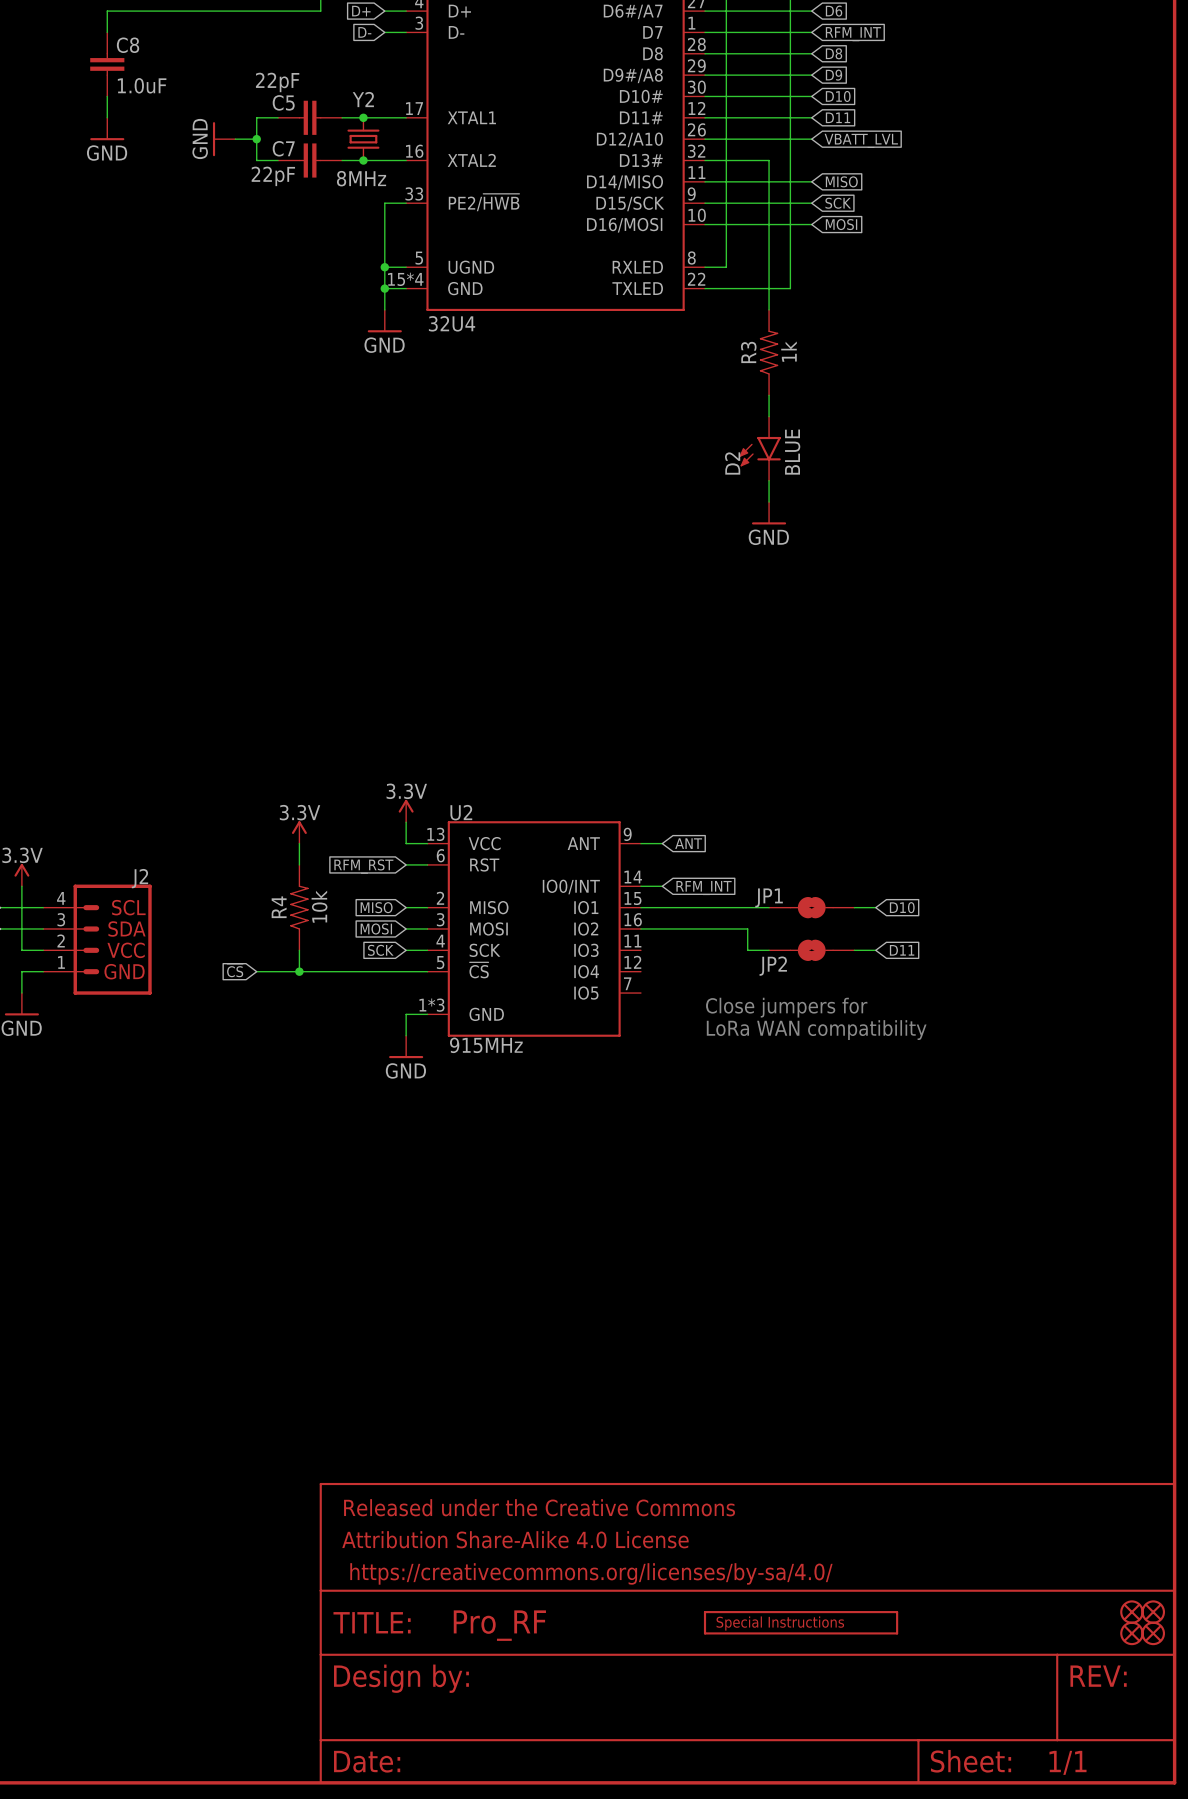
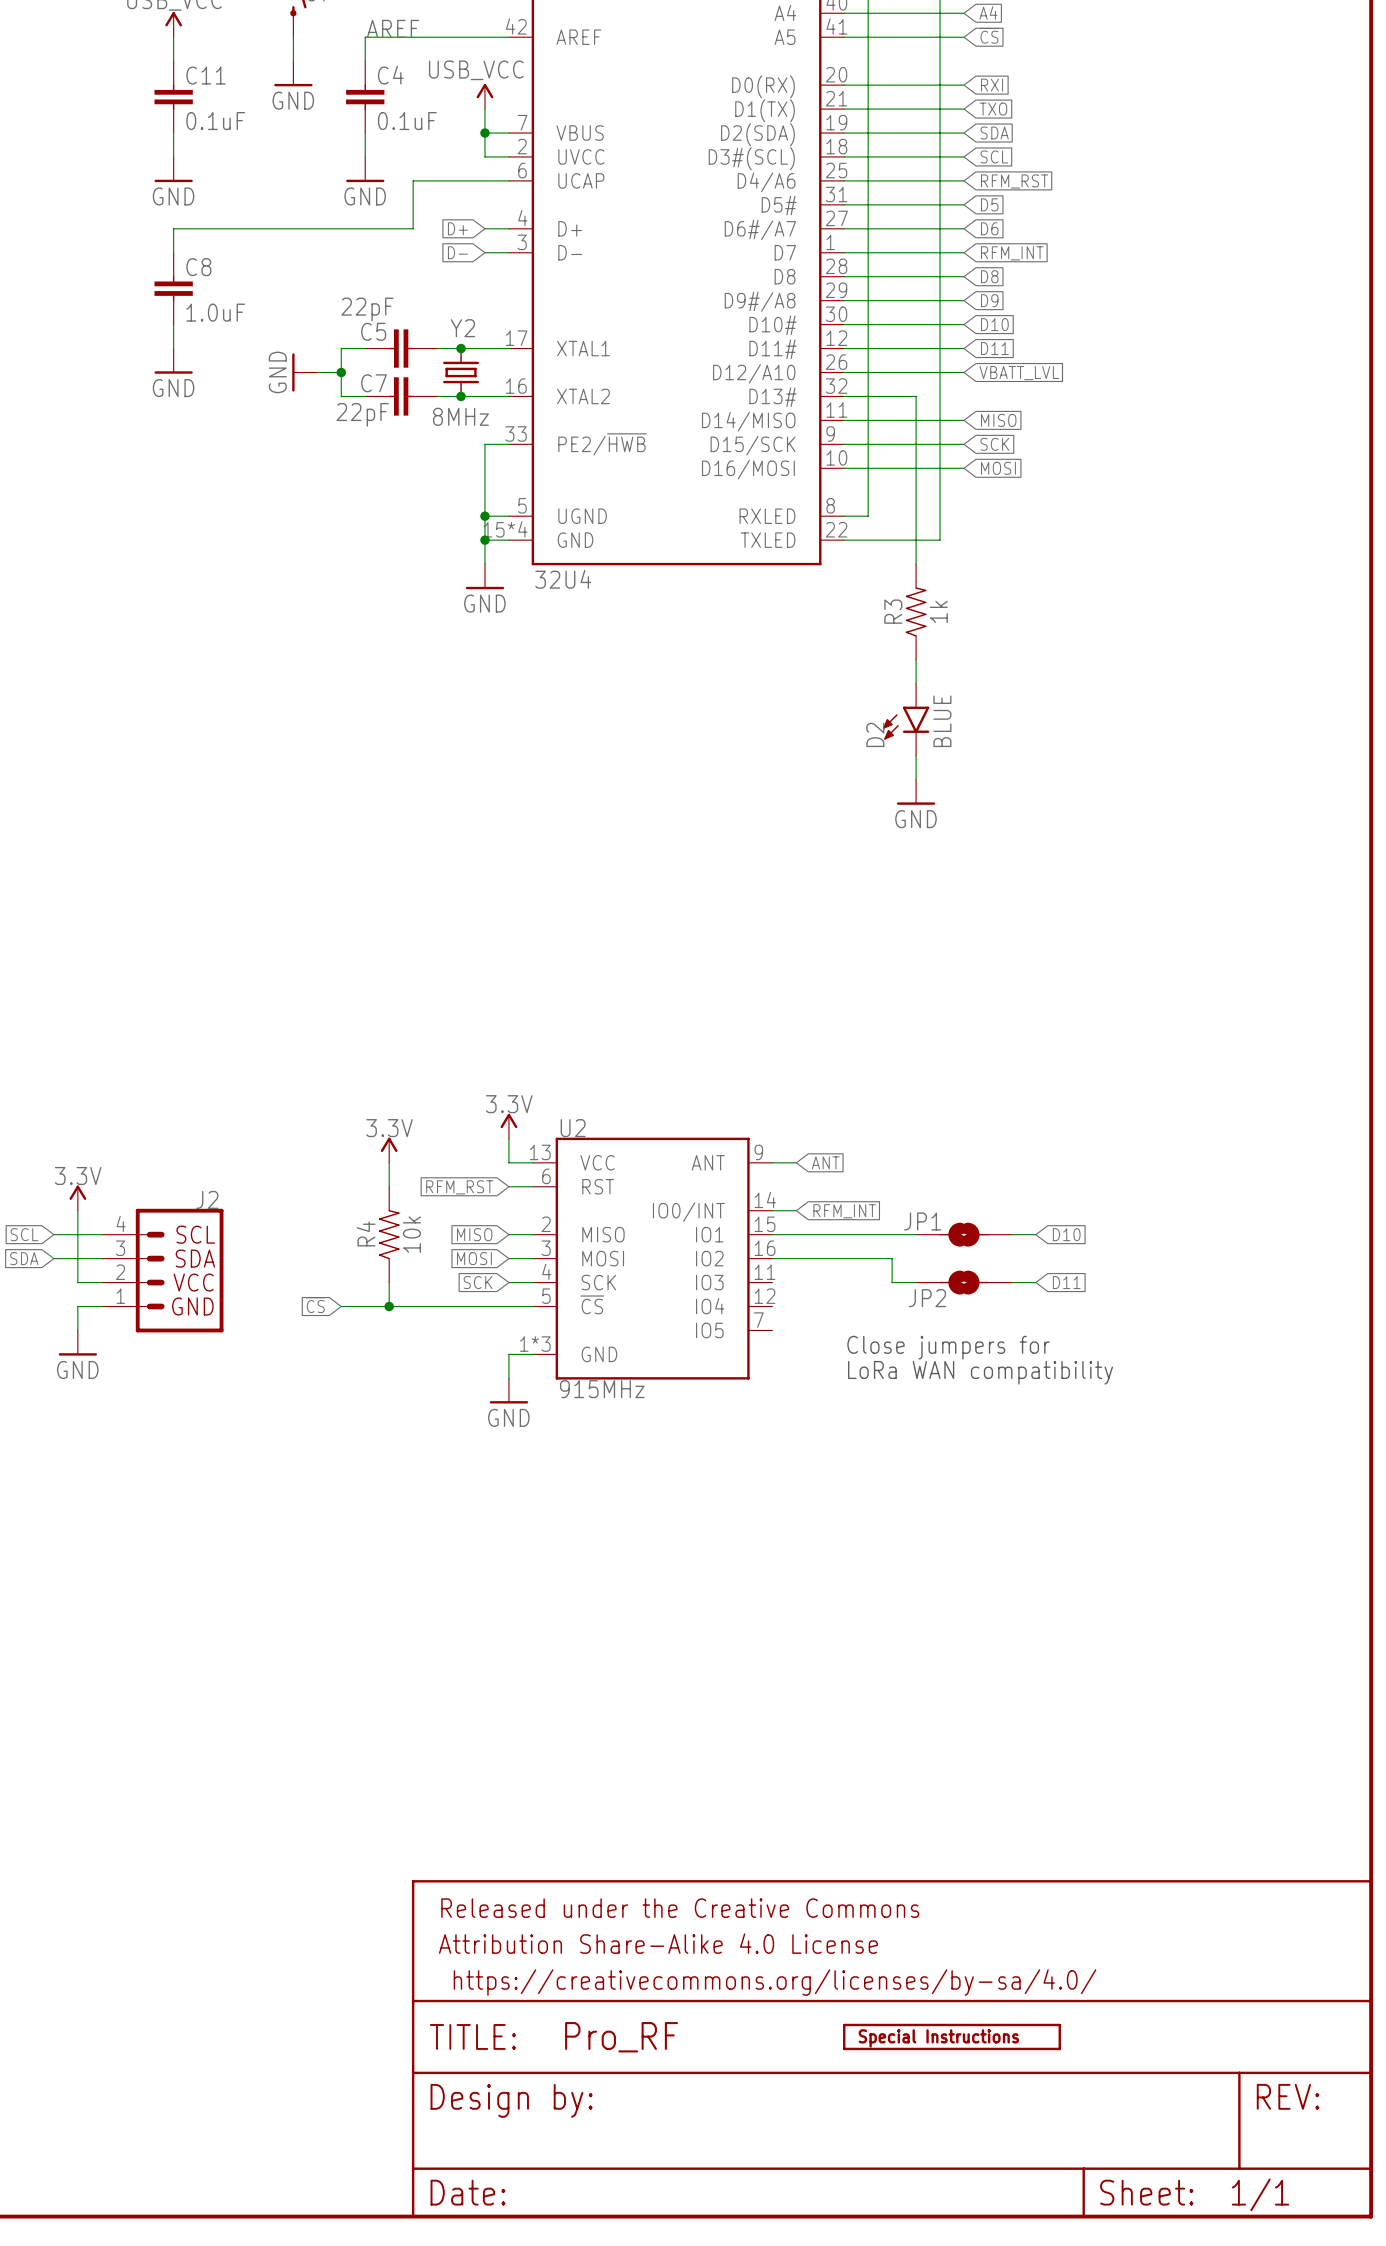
part: (1131, 1612) -> none
part: (1153, 1612) -> none
part: (1131, 1633) -> none
part: (1153, 1633) -> none

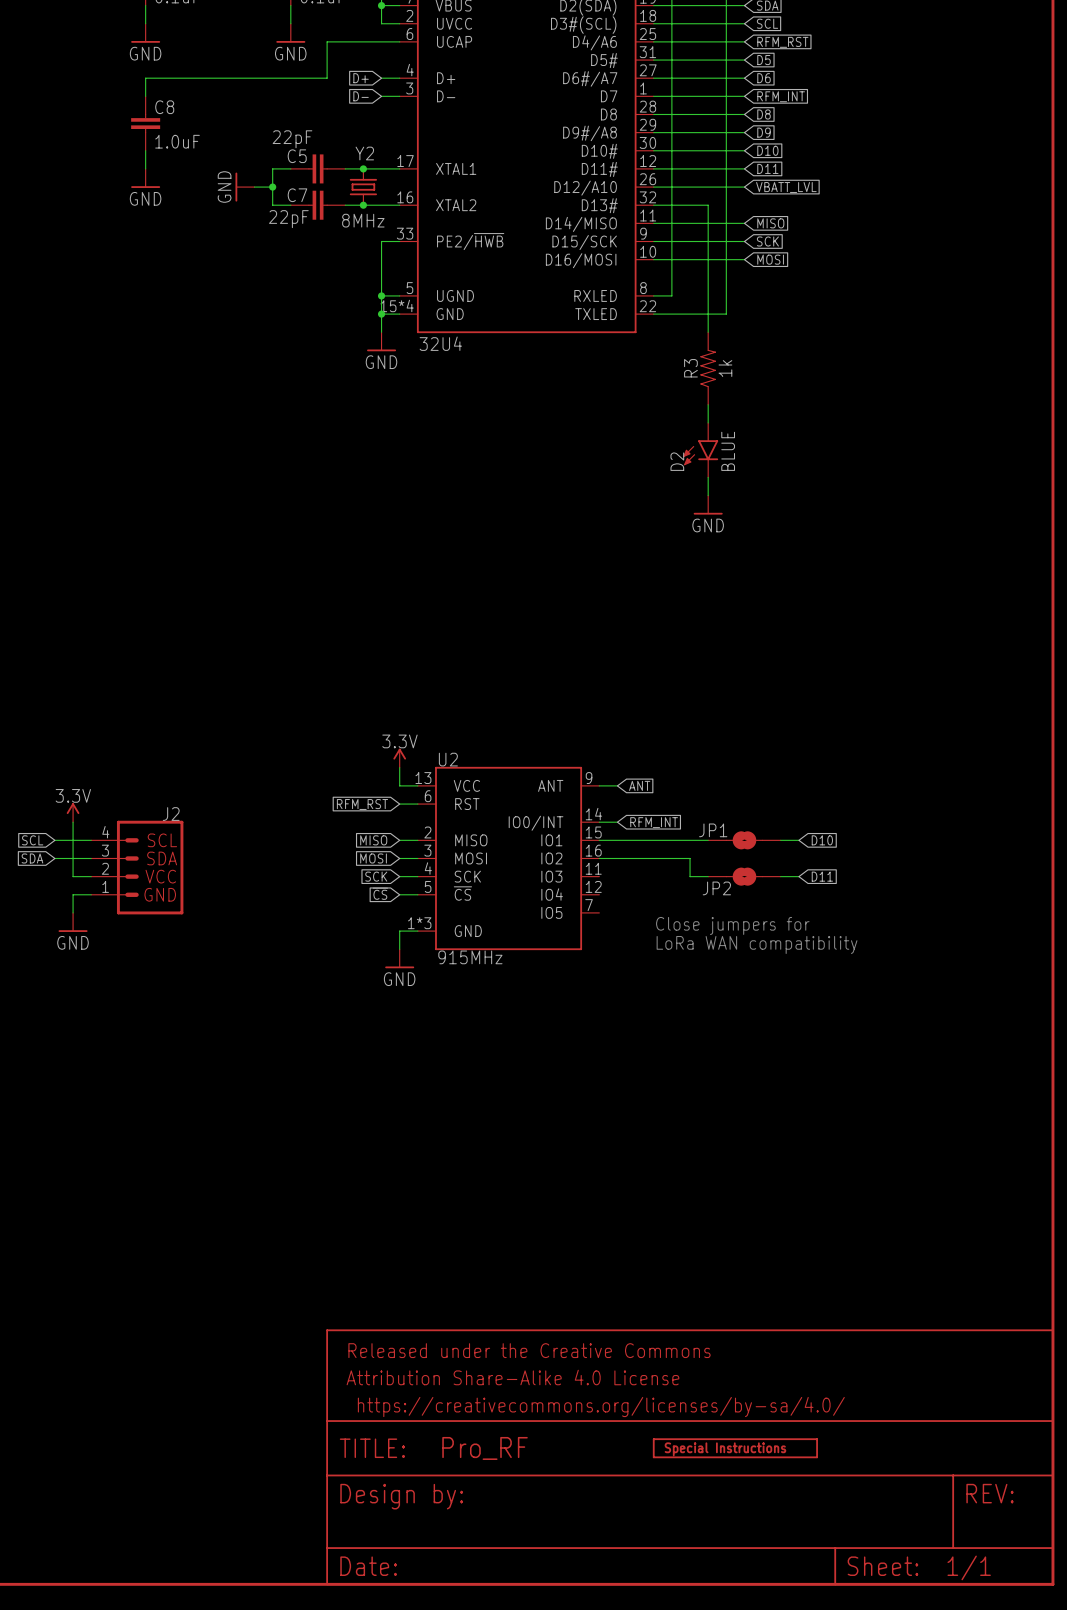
power symbol: 3.3V (389, 1150) -> none
wire: (389, 1162) (389, 1186) -> none
R4: 10k (389, 1234) -> none
wire: (389, 1282) (389, 1306) -> none
global label position: ~{CS} (315, 1305) -> ~{CS} (380, 893)
wire: (341, 1306) (508, 1306) -> none
junction: (389, 1306) -> none

